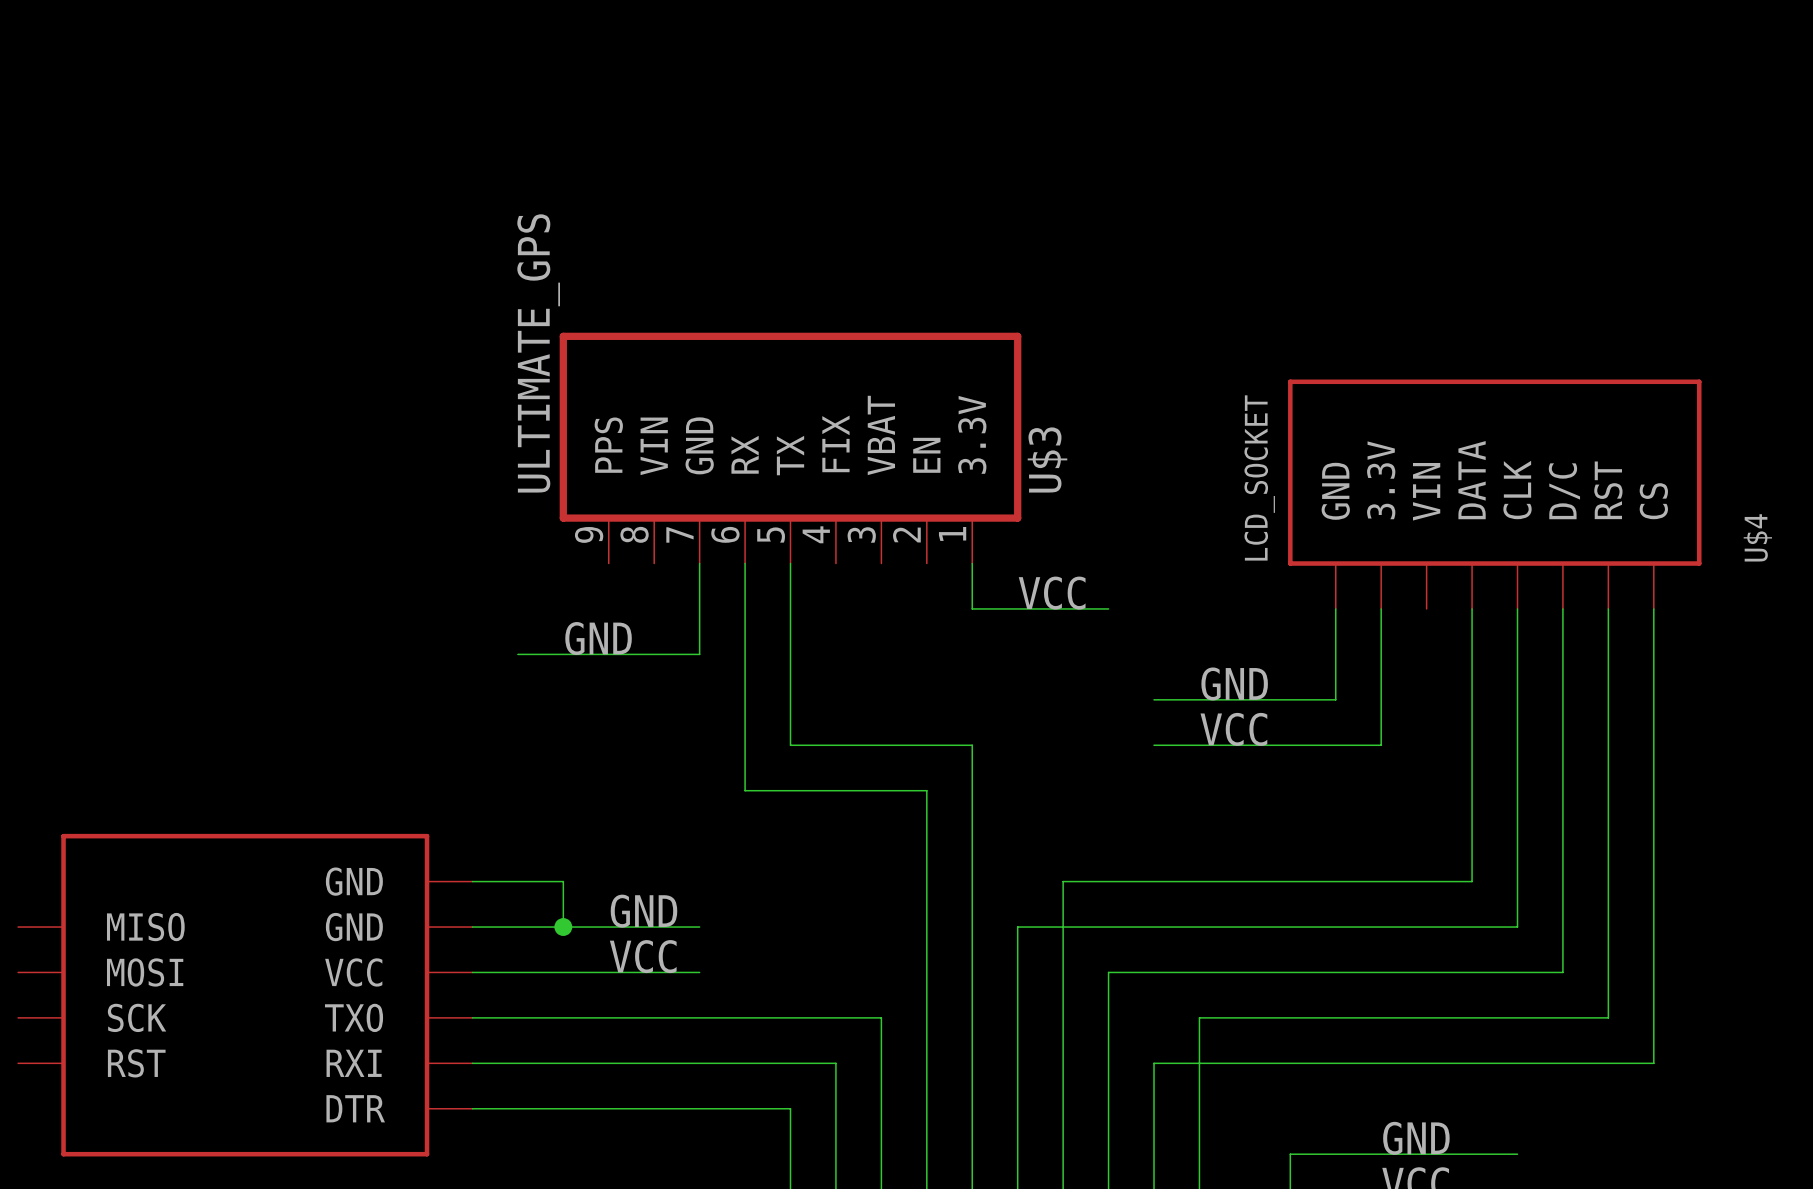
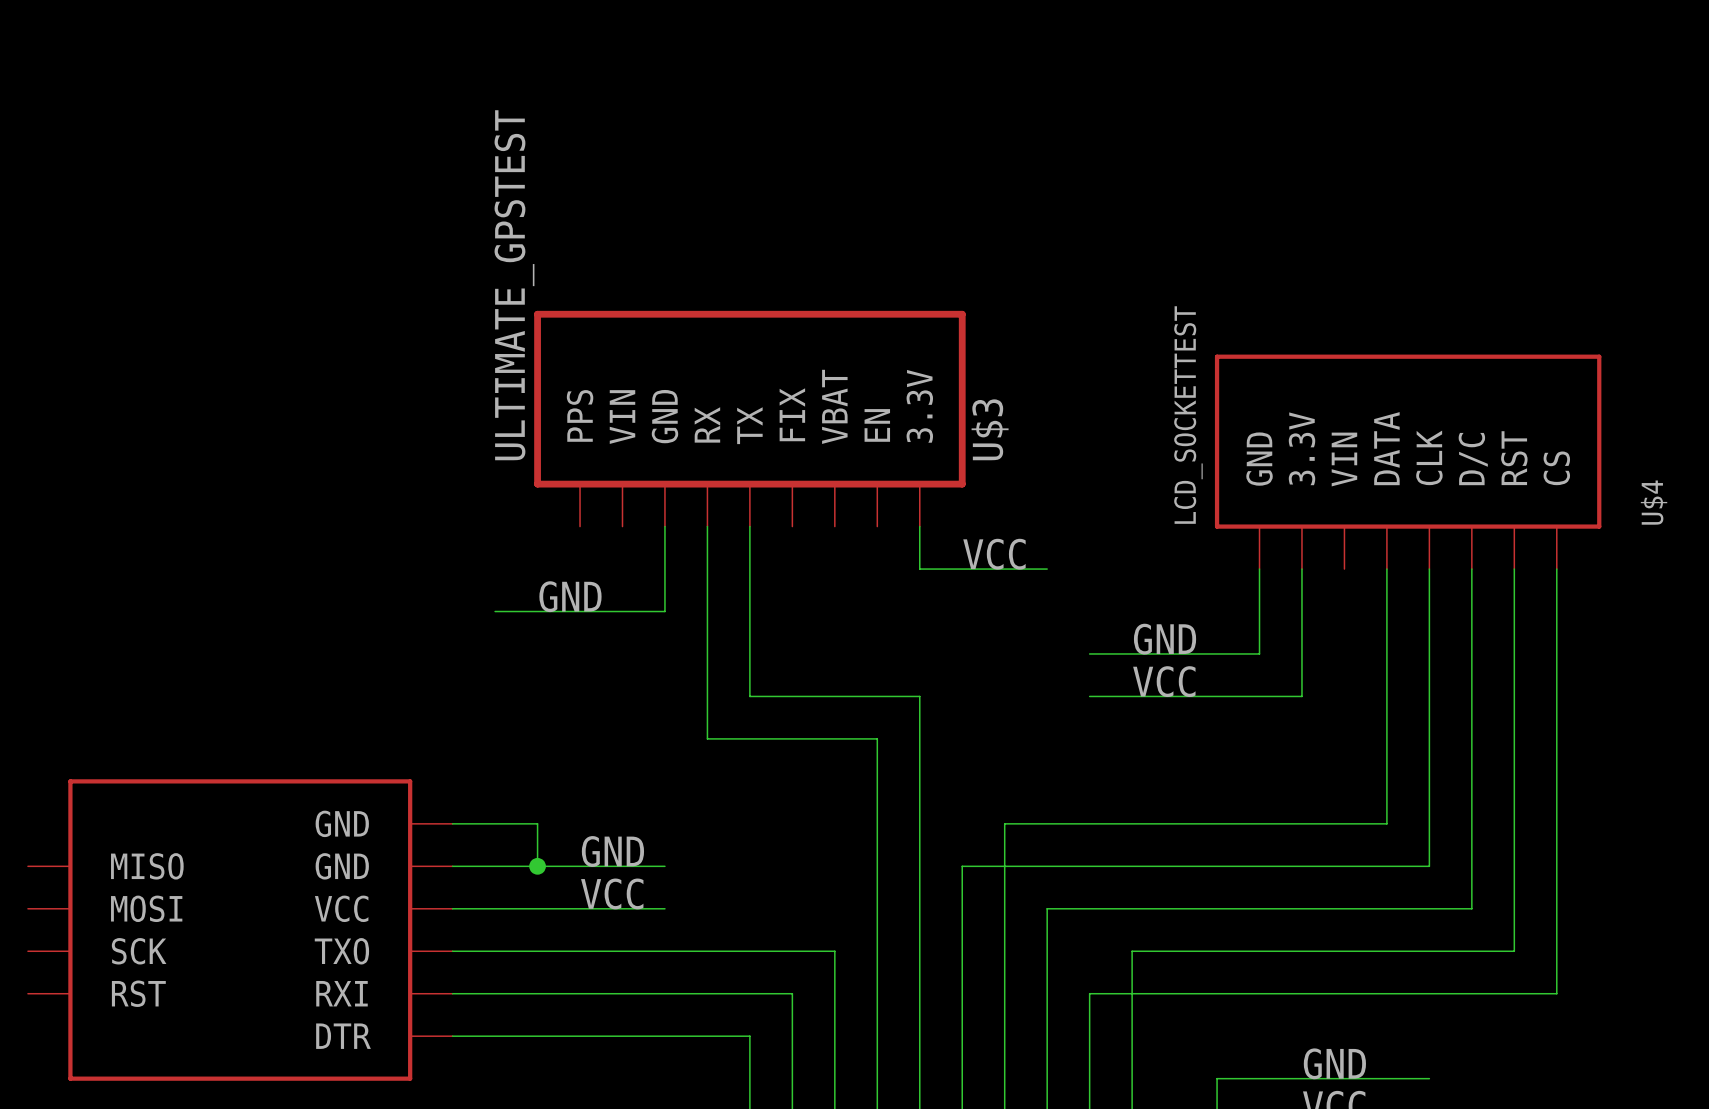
U$3 symbol: [559, 332, 1022, 564] -> [534, 310, 966, 527]
U$3 value: ULTIMATE_GPS (538, 353) -> ULTIMATE_GPSTEST (514, 285)
U$4 value: LCD_SOCKET (1259, 477) -> LCD_SOCKETTEST (1188, 415)

